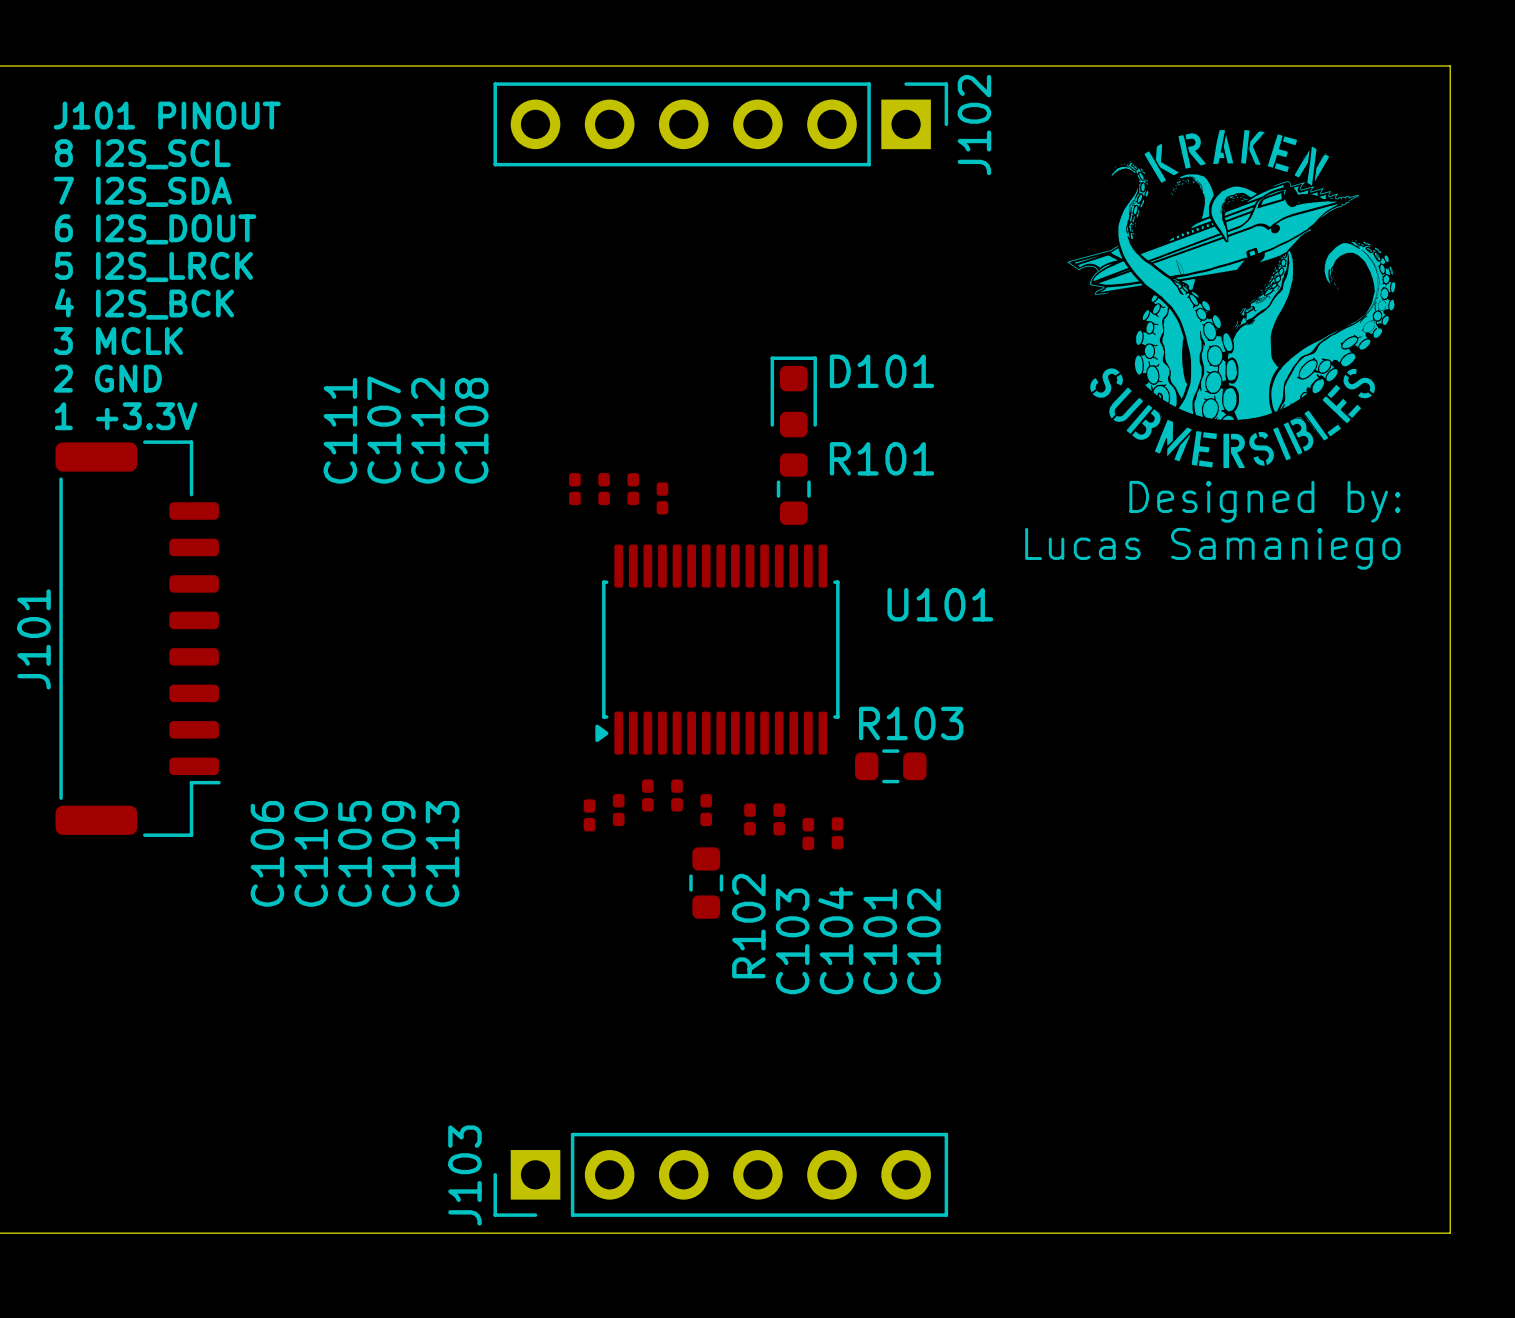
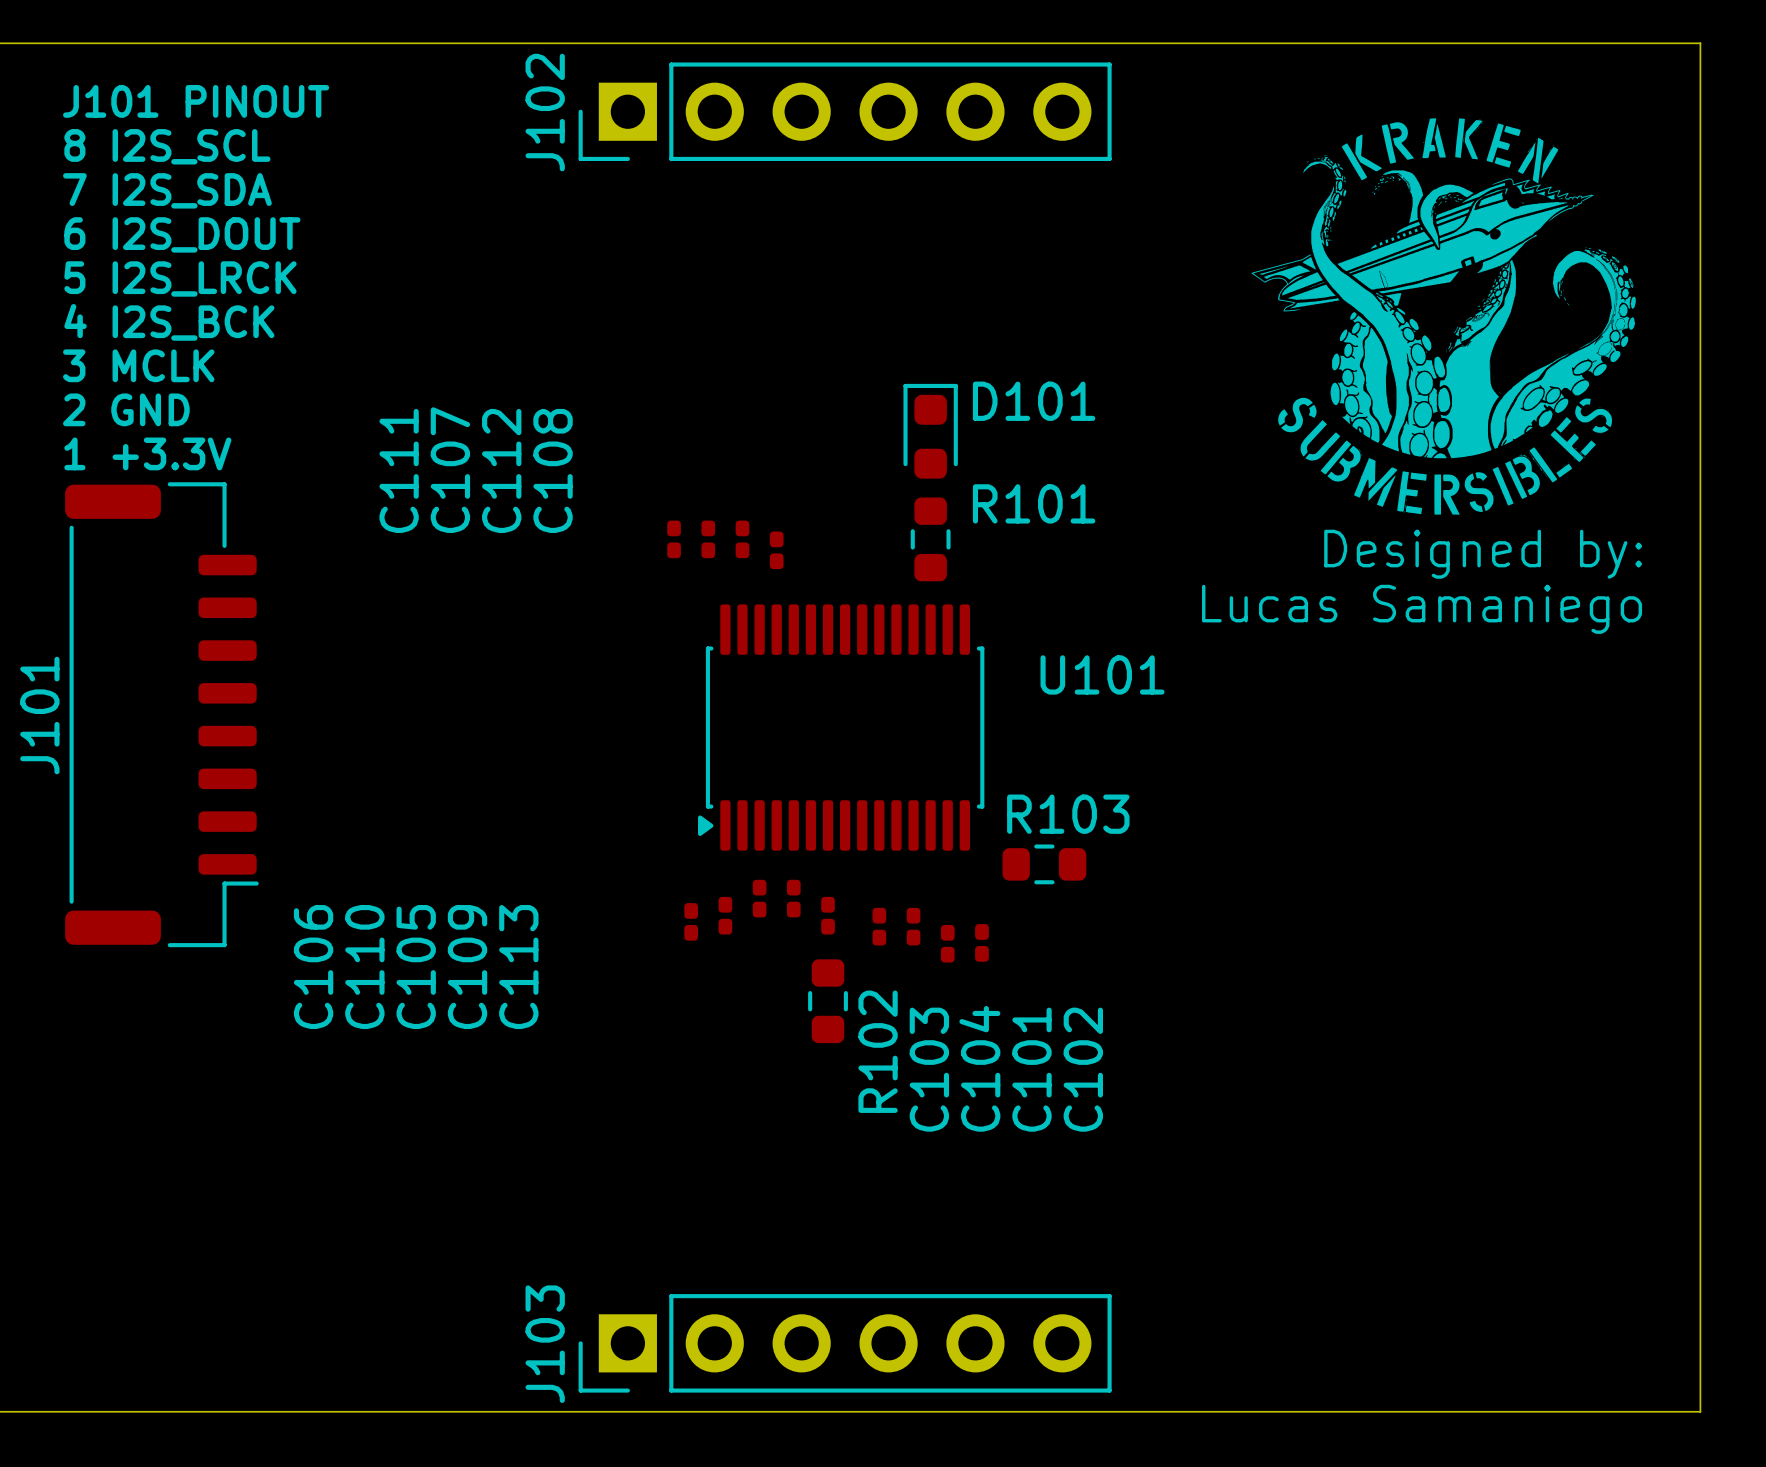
J102 rotation: 0° (720, 124) -> 180° (845, 111)

